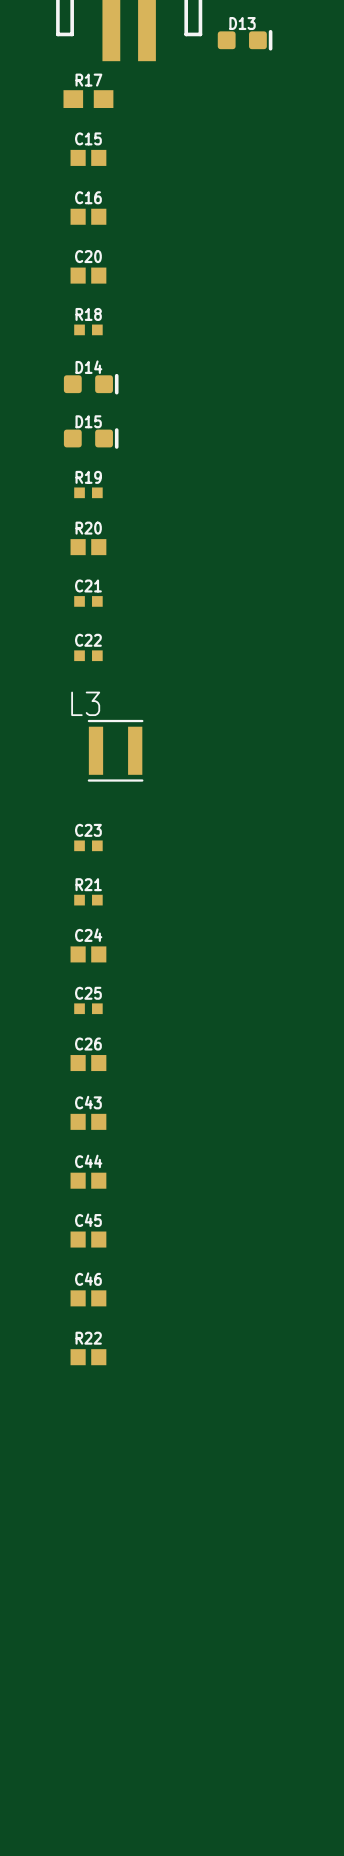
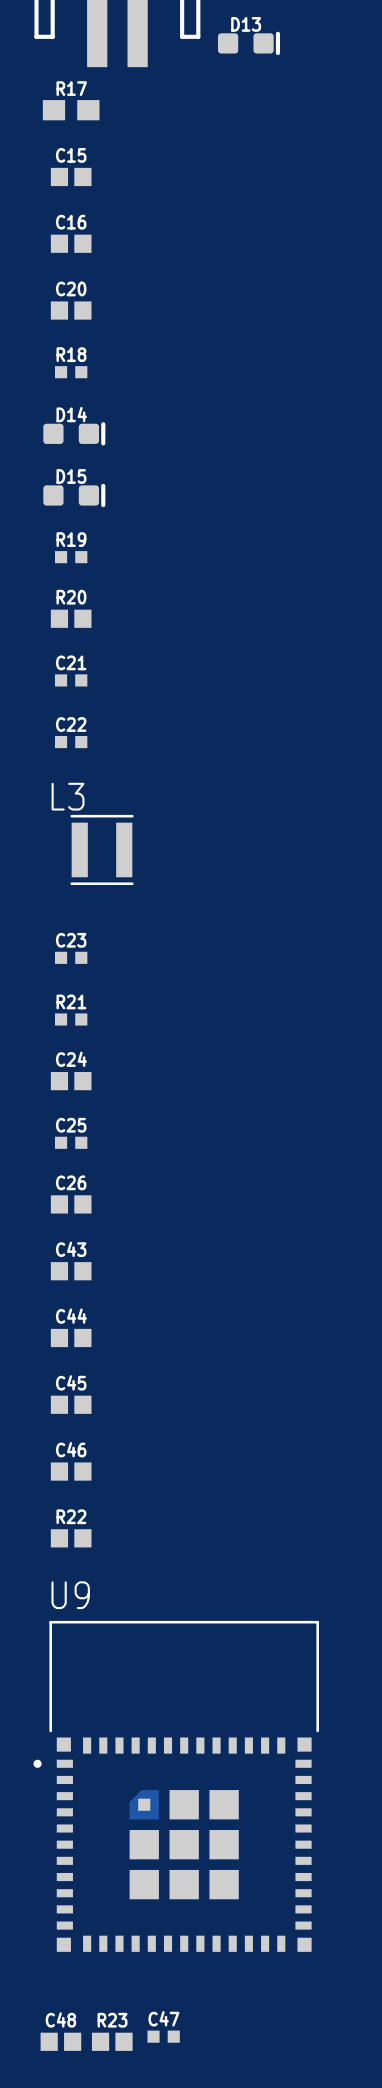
U9: none -> (176, 1786)
C47: none -> (163, 2036)
C48: none -> (60, 2041)
R23: none -> (112, 2041)

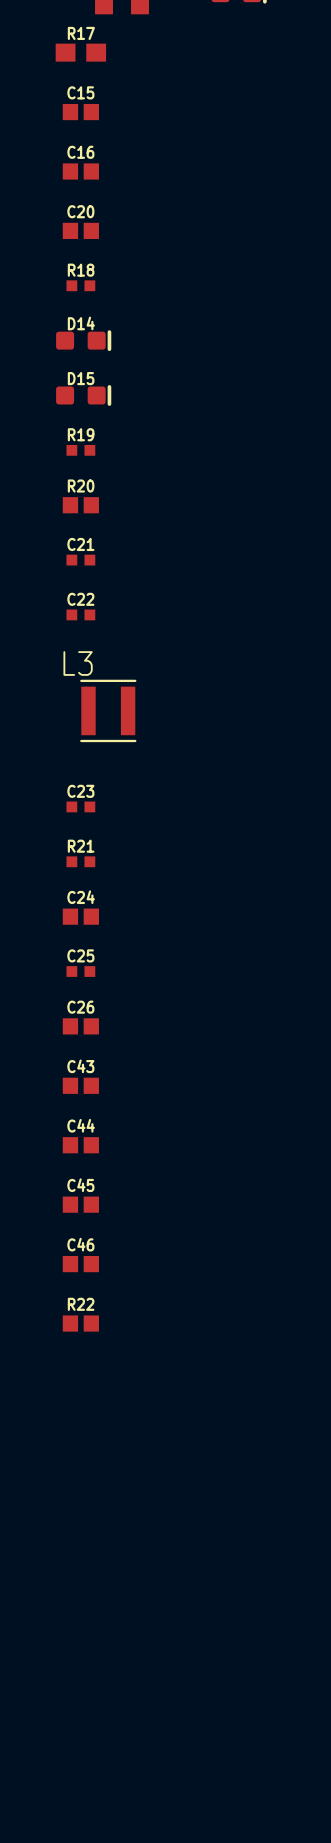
U9: (176, 1786) -> none
C47: (163, 2036) -> none
C48: (60, 2041) -> none
R23: (112, 2041) -> none

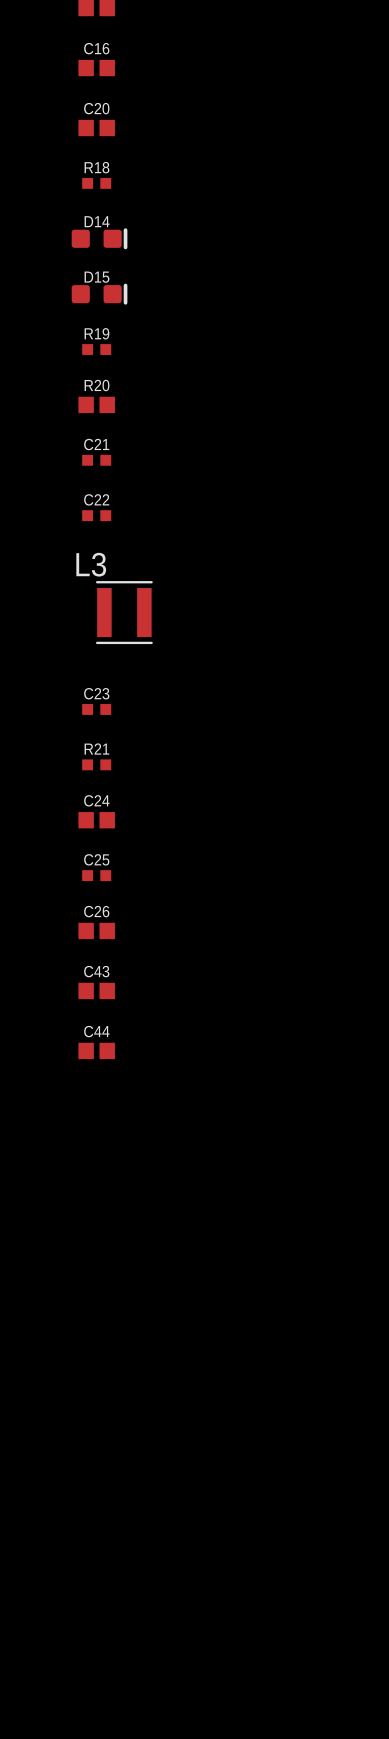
C45: (80, 1204) -> none
C46: (80, 1264) -> none
R22: (80, 1323) -> none

